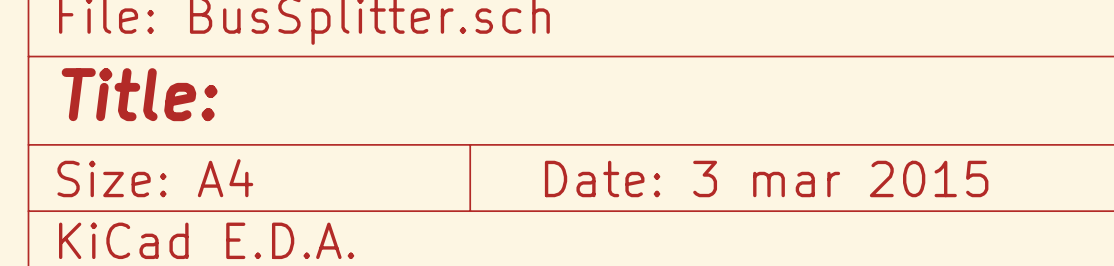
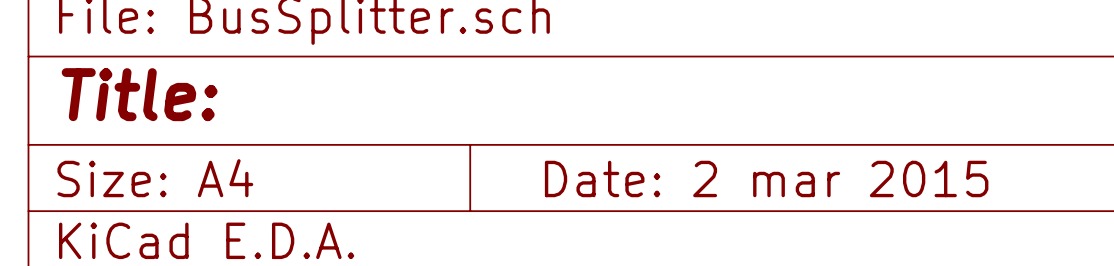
title block: Date: 3 mar 2015 (766, 178) -> Date: 2 mar 2015 (766, 178)

